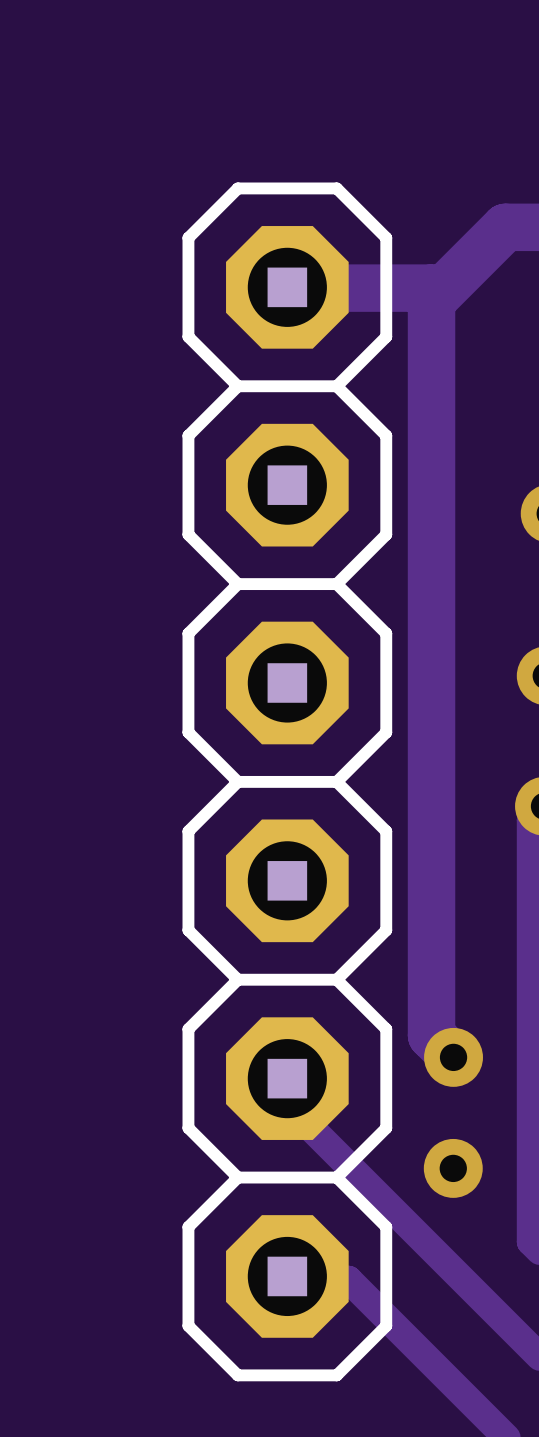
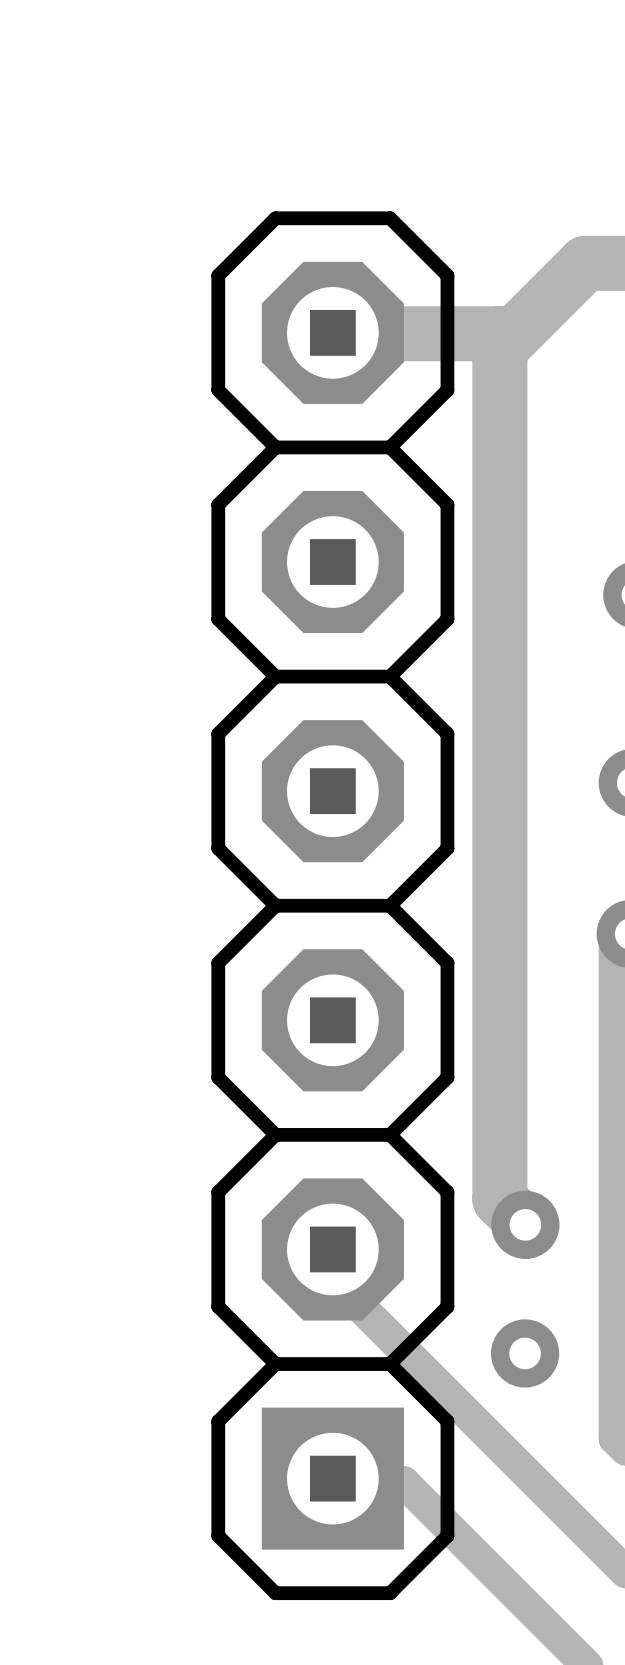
part footprint: [182, 182, 393, 1382] -> [211, 211, 455, 1601]

